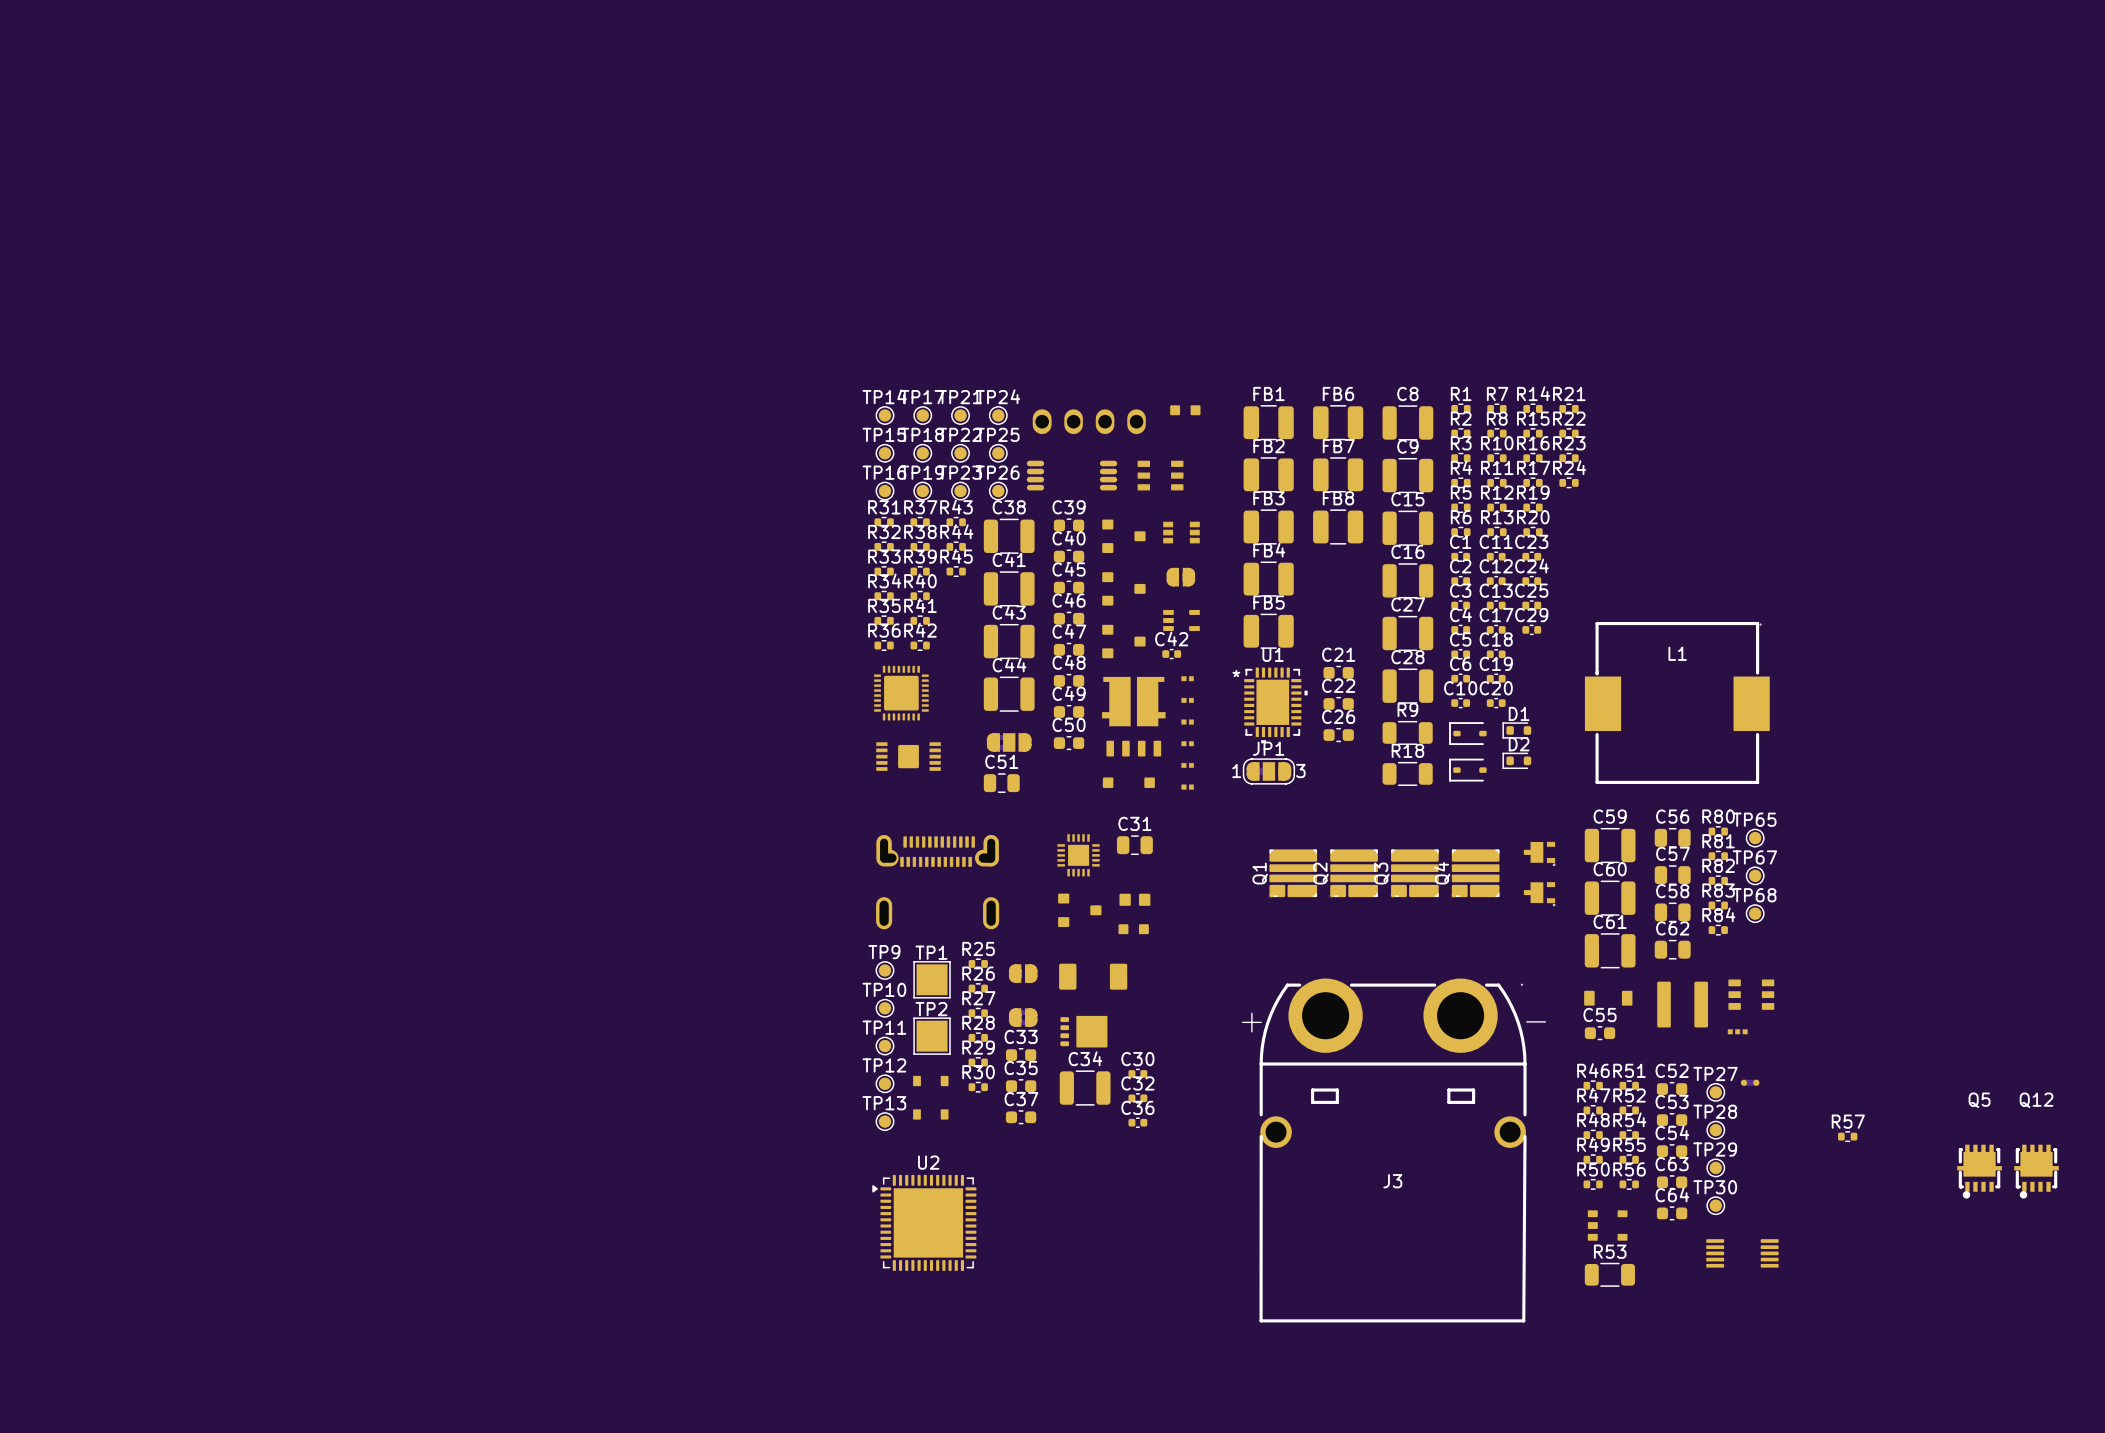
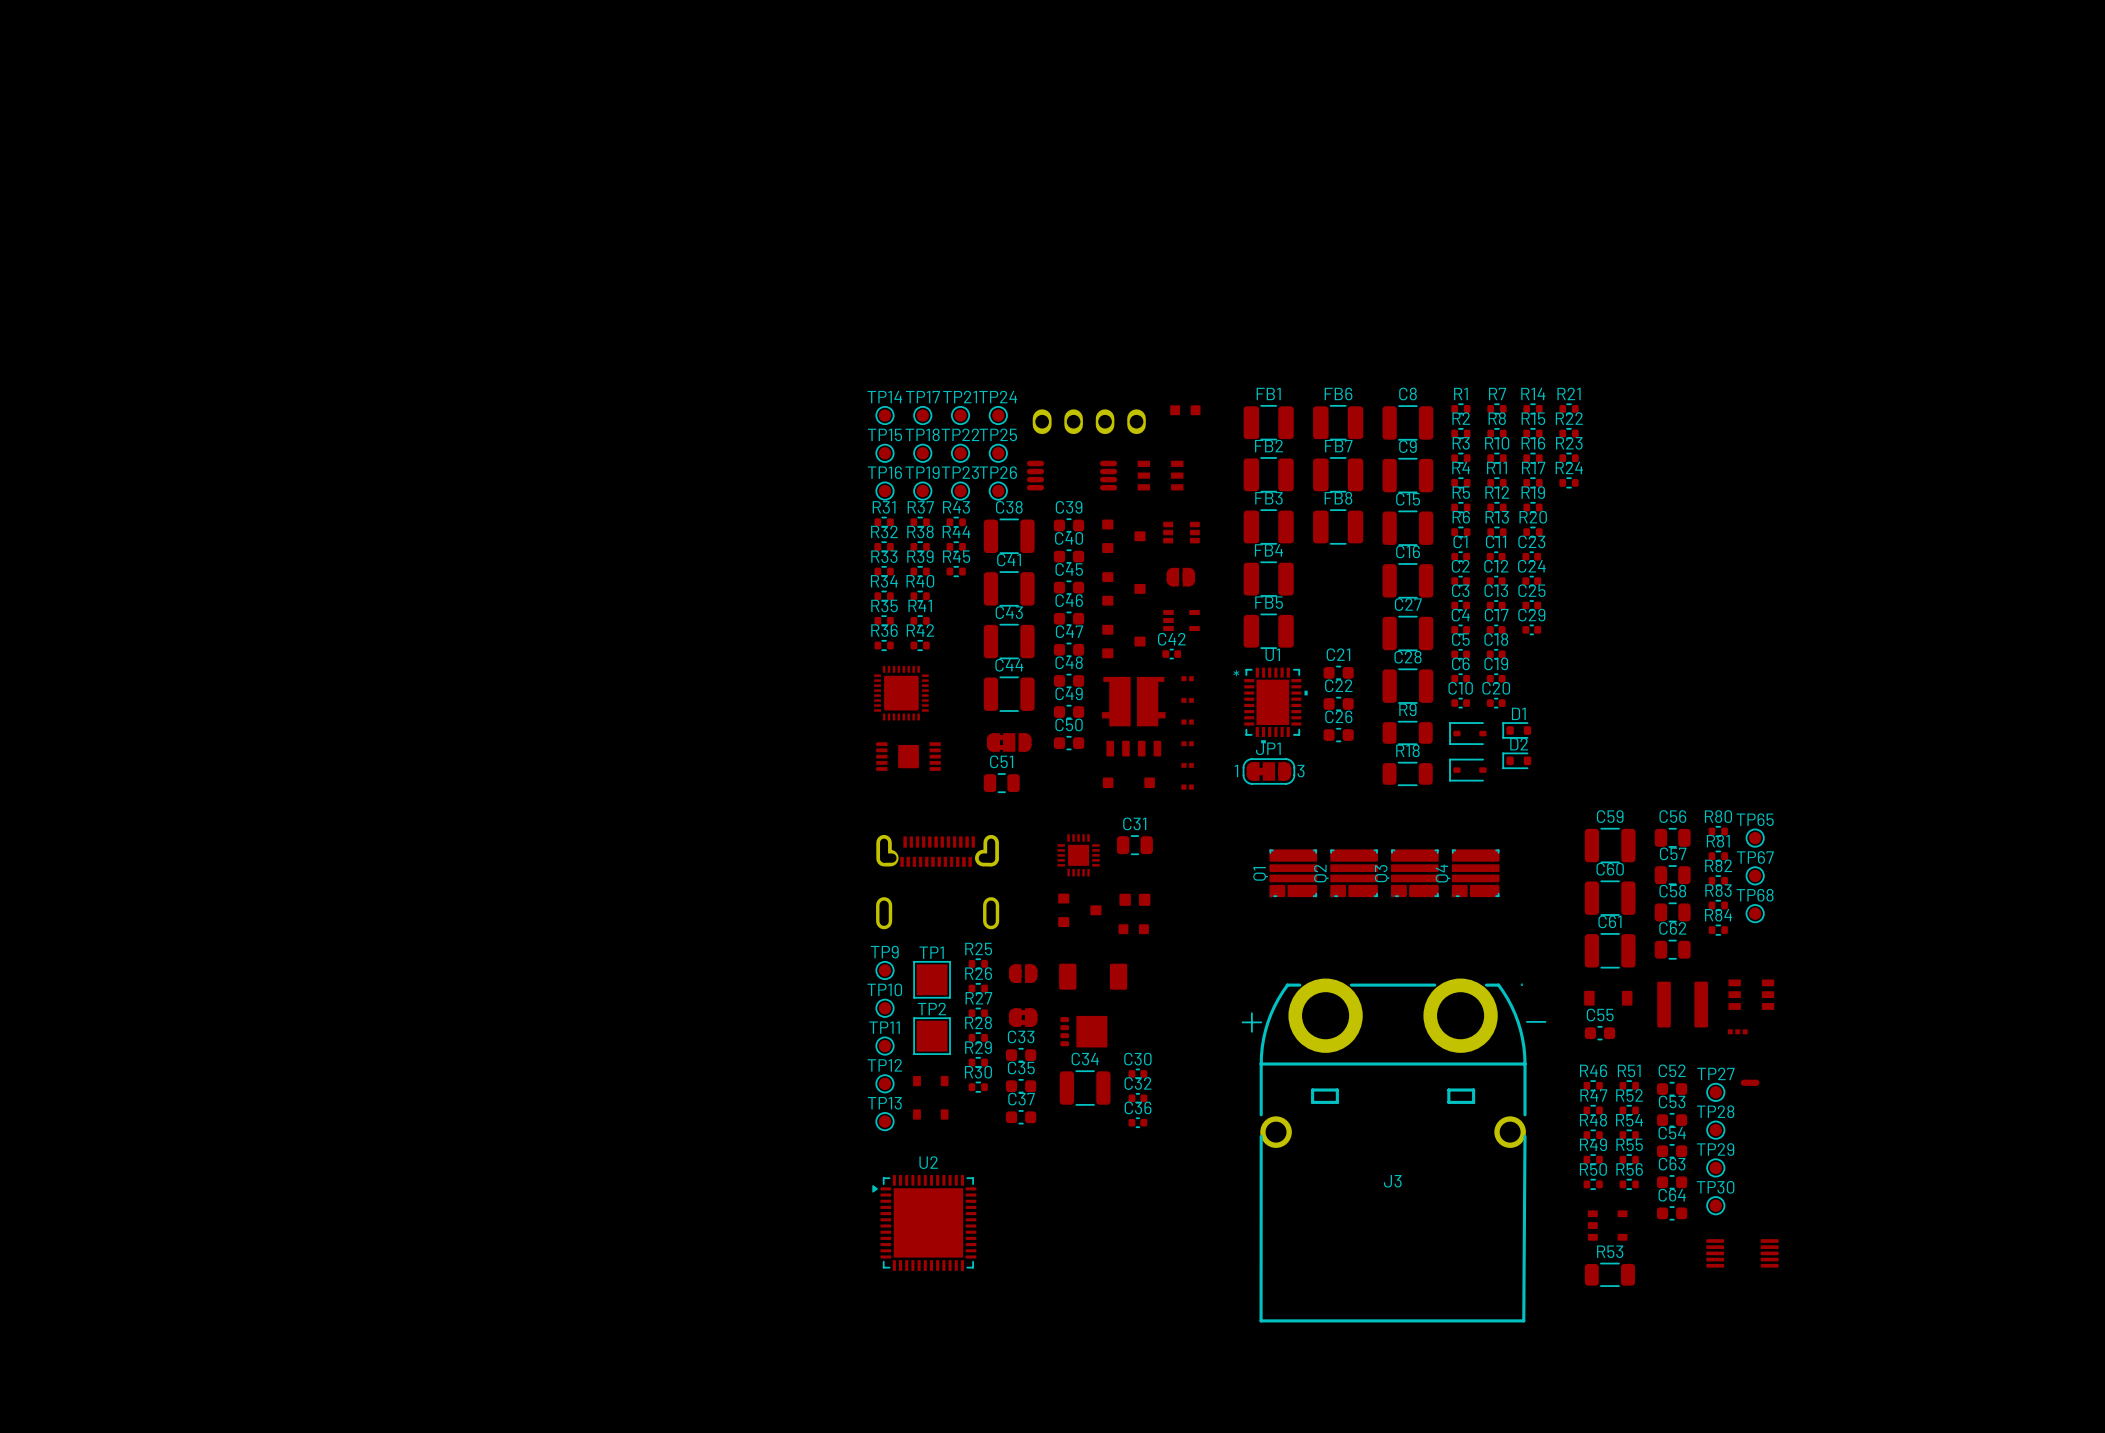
L1: (1677, 702) -> none
part: (1539, 853) -> none
part: (1539, 894) -> none
R57: (1847, 1136) -> none
Q5: (1979, 1171) -> none
Q12: (2036, 1171) -> none

